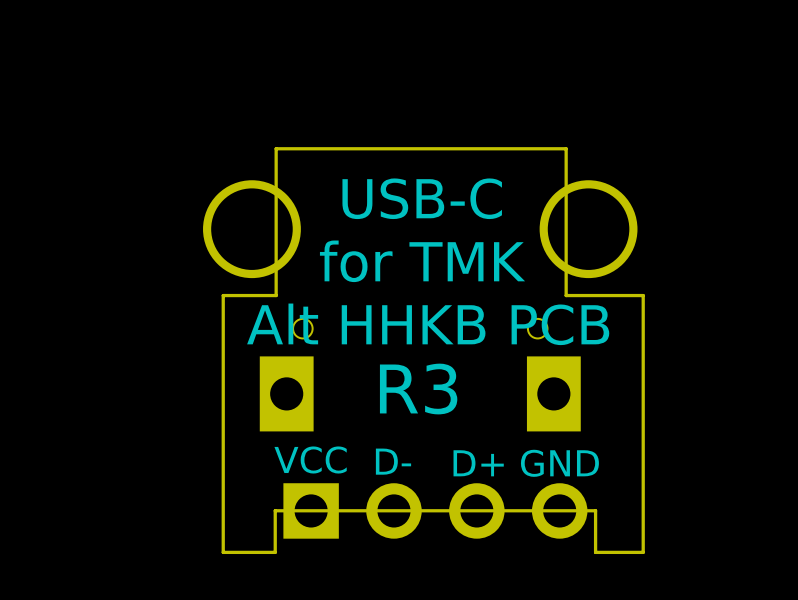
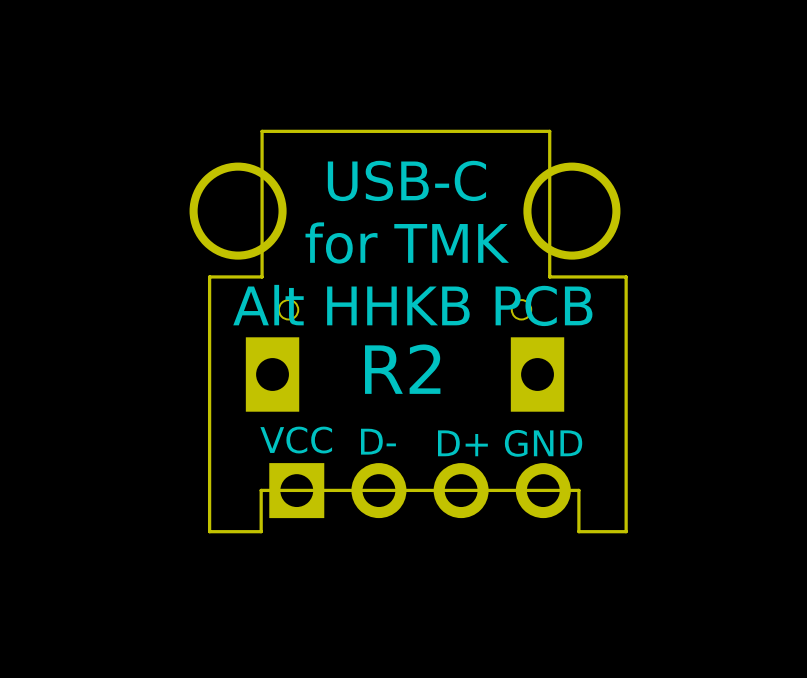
text: R3 (418, 389) -> R2 (402, 369)

